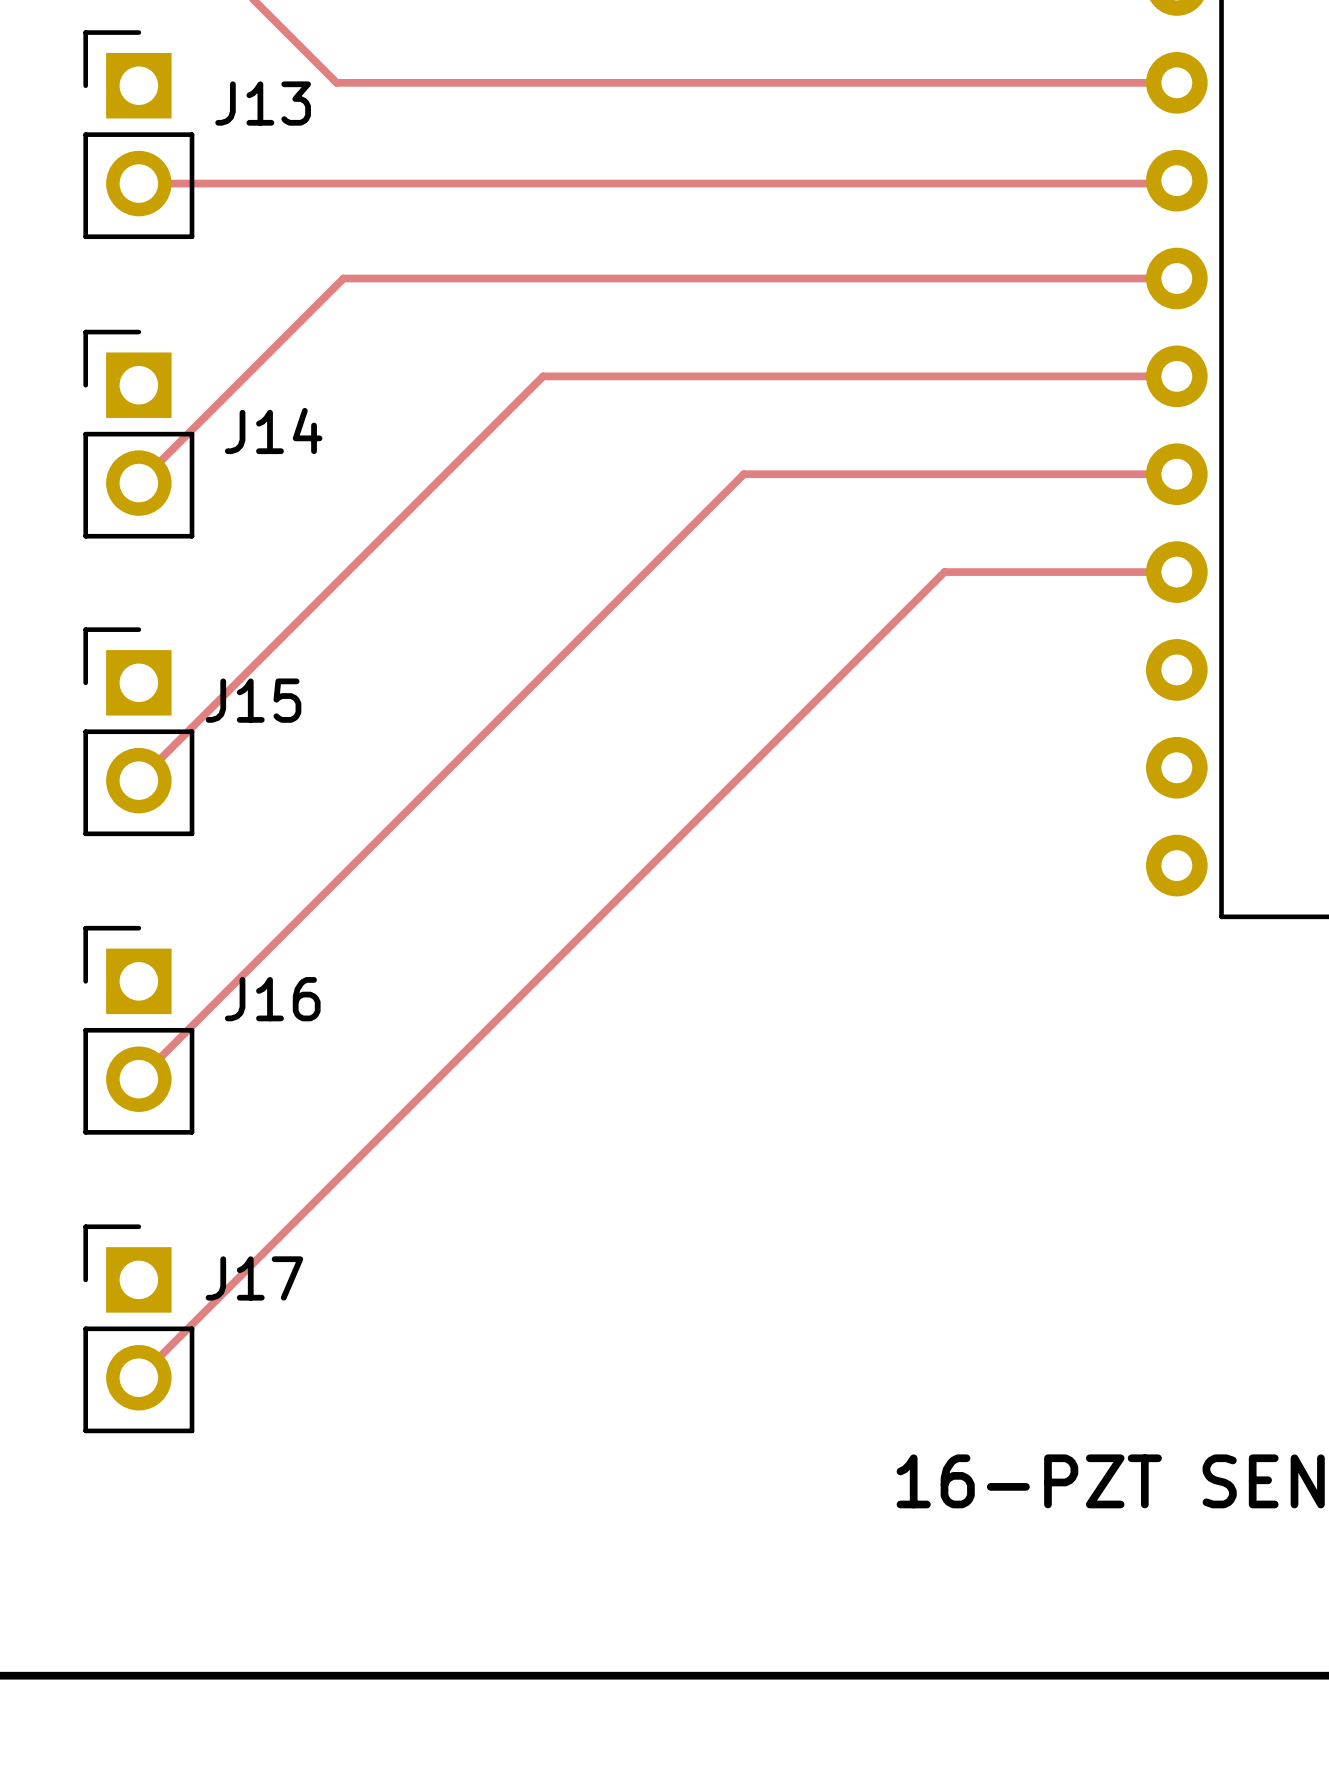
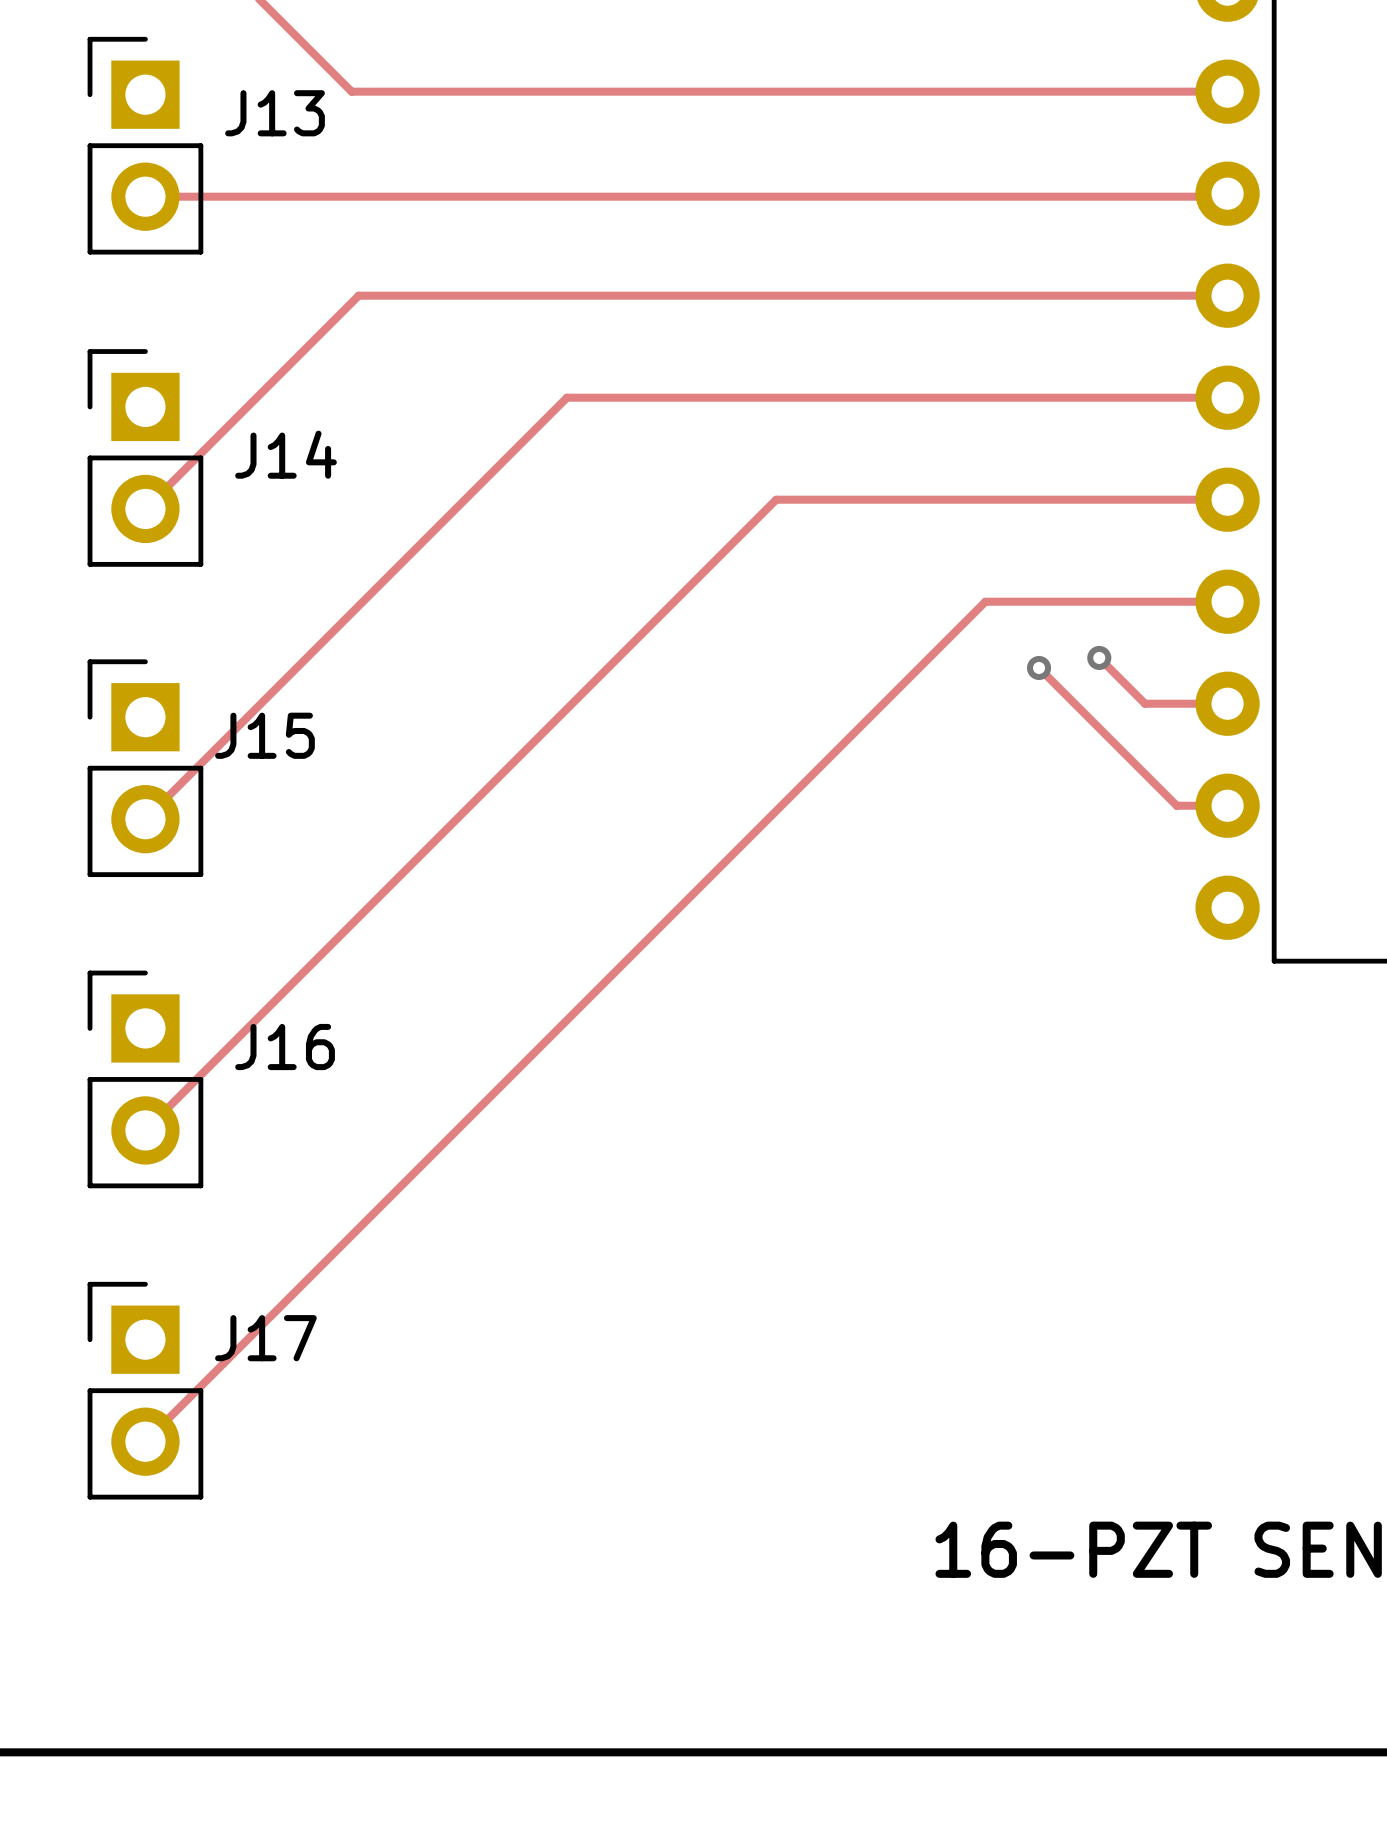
track: none -> (1099, 657) (1145, 703) (1227, 703)
via: none -> (1099, 657)
track: none -> (1039, 667) (1176, 805) (1227, 805)
via: none -> (1039, 667)

